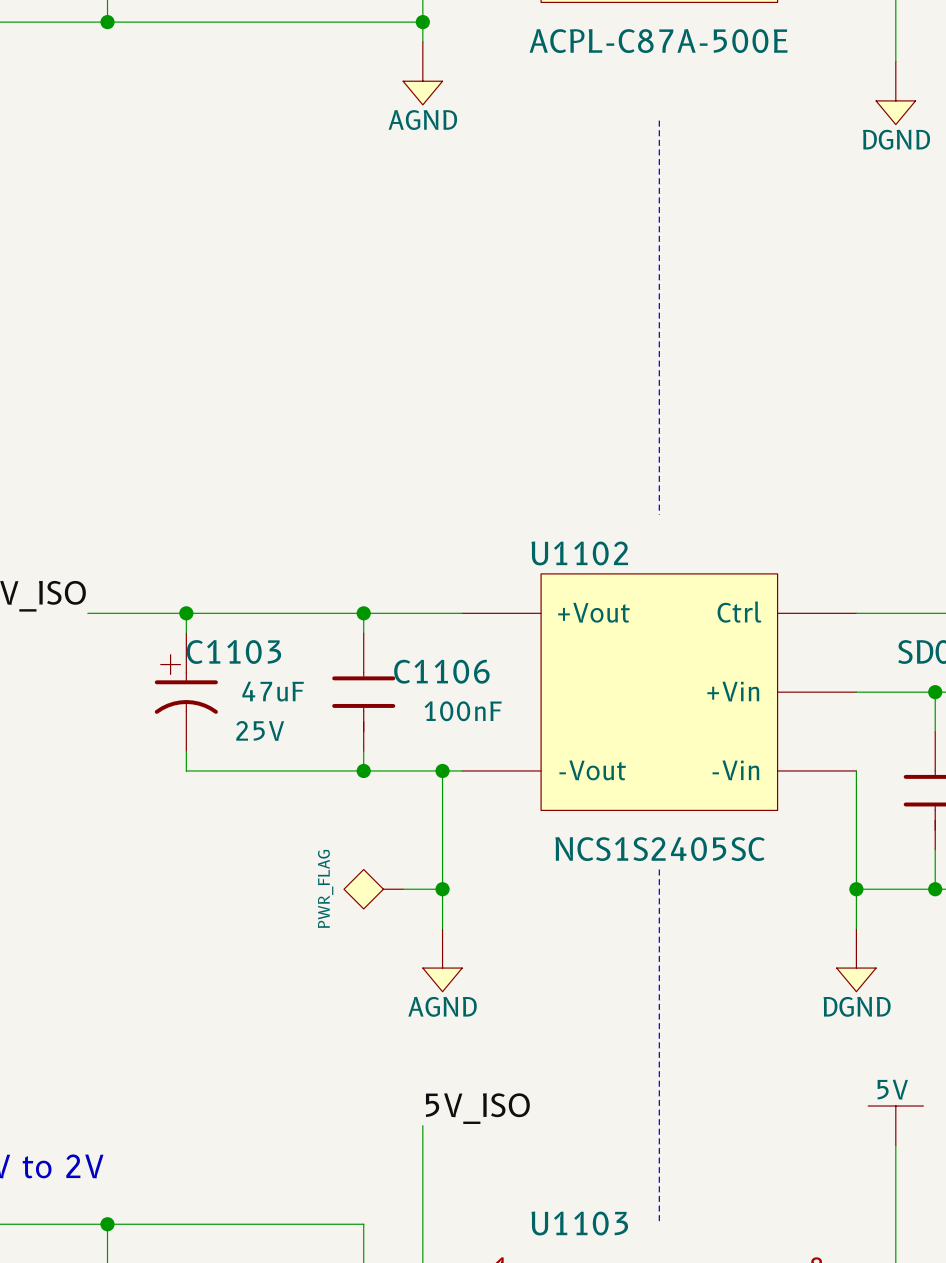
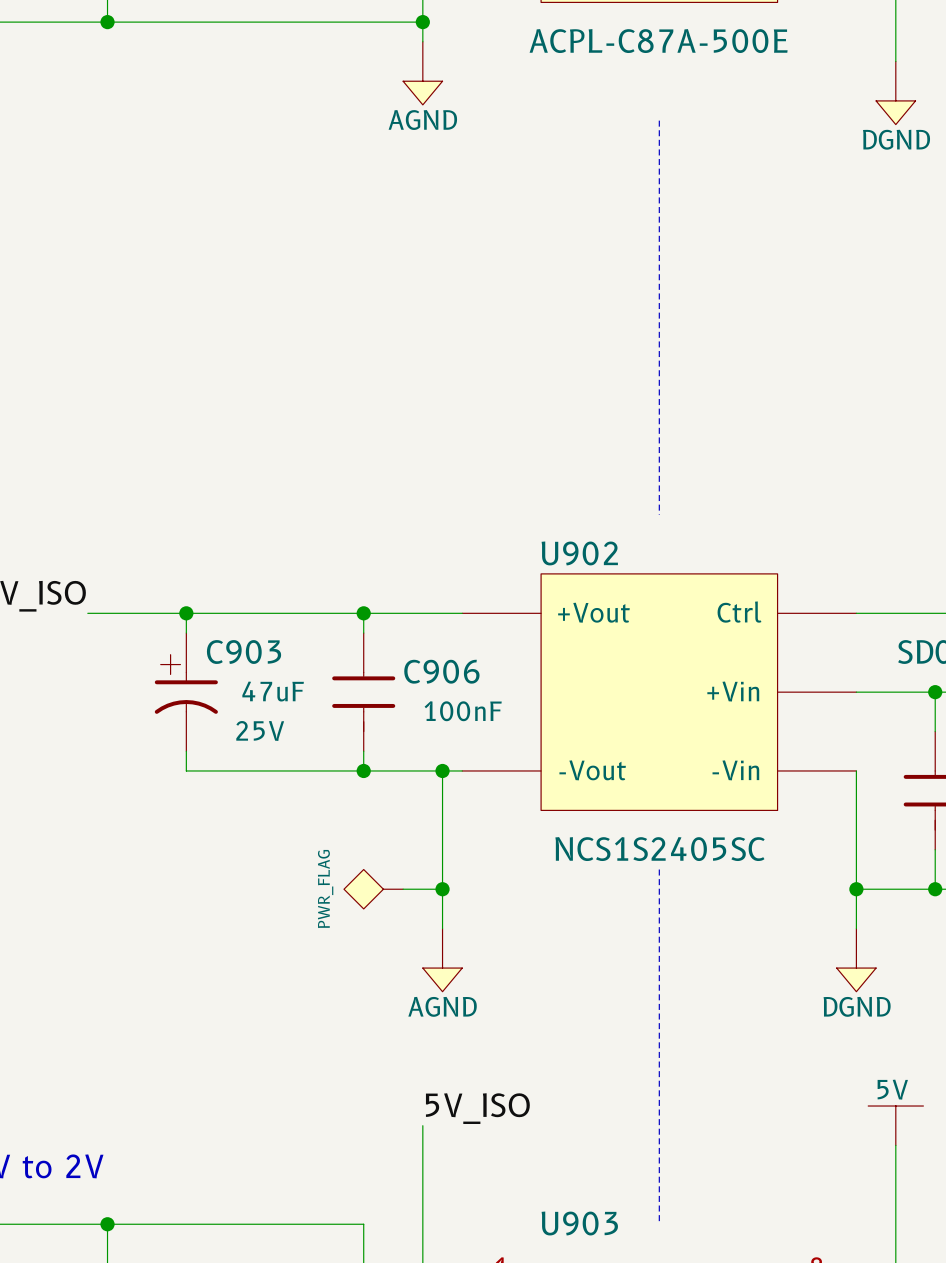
U1102 name: U1102 (579, 553) -> U902 (579, 553)
C1103 name: C1103 (233, 651) -> C903 (244, 652)
C1106 name: C1106 (441, 671) -> C906 (441, 671)
U1103 name: U1103 (579, 1223) -> U903 (579, 1223)

